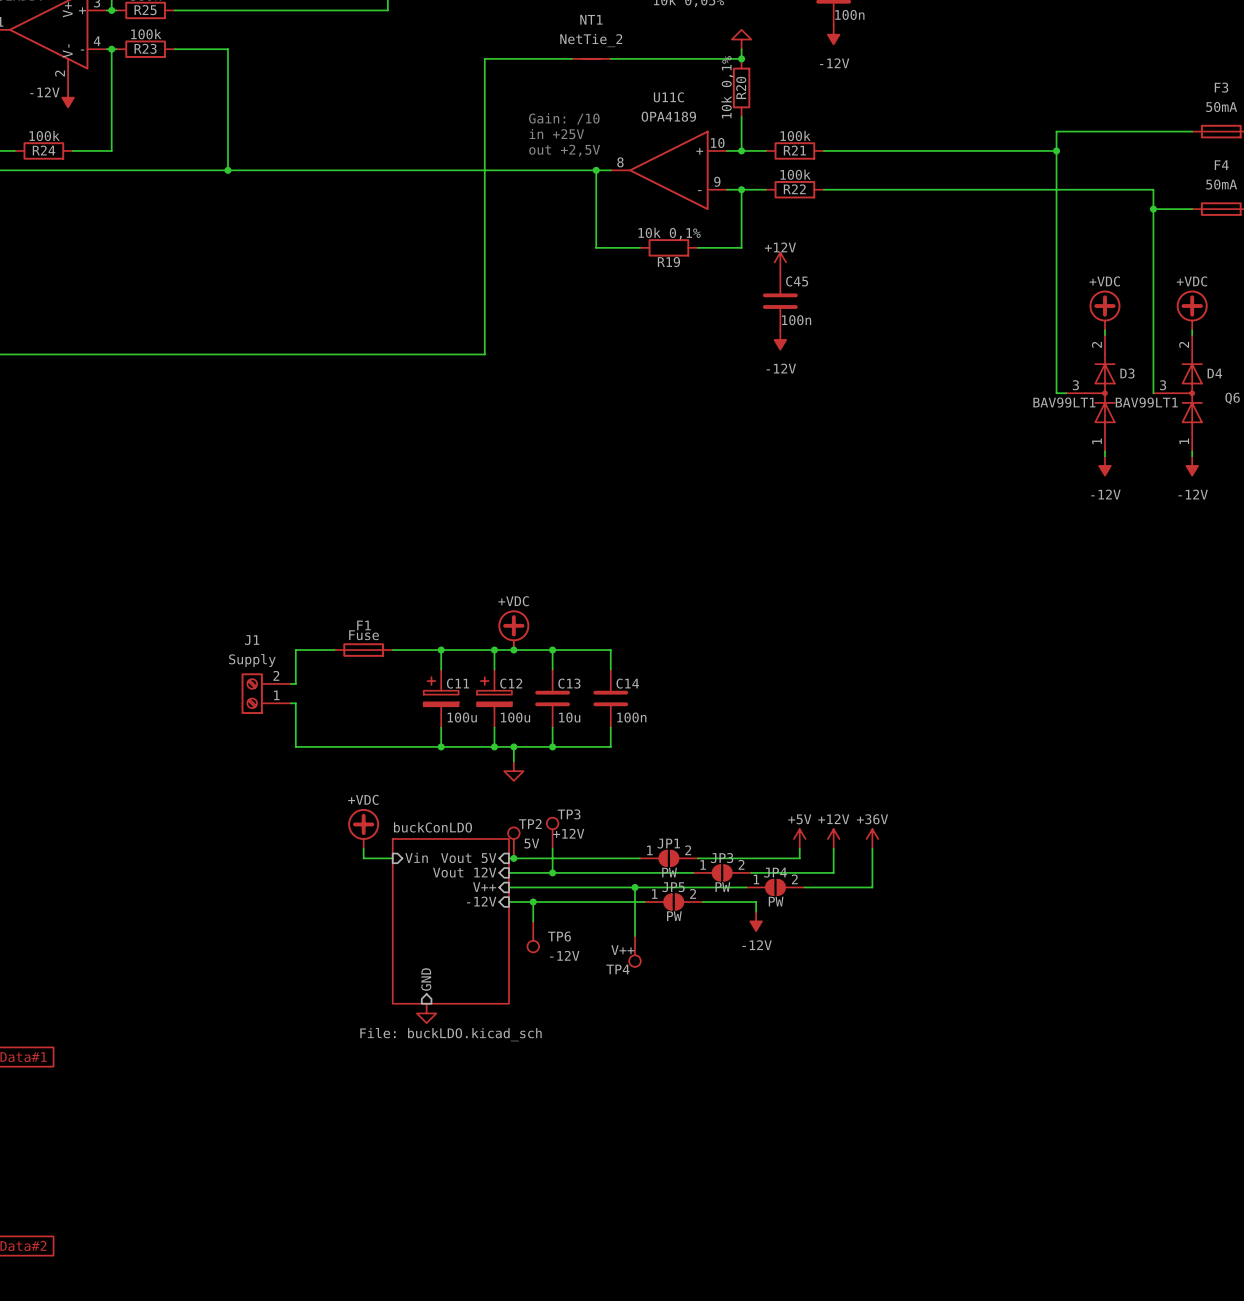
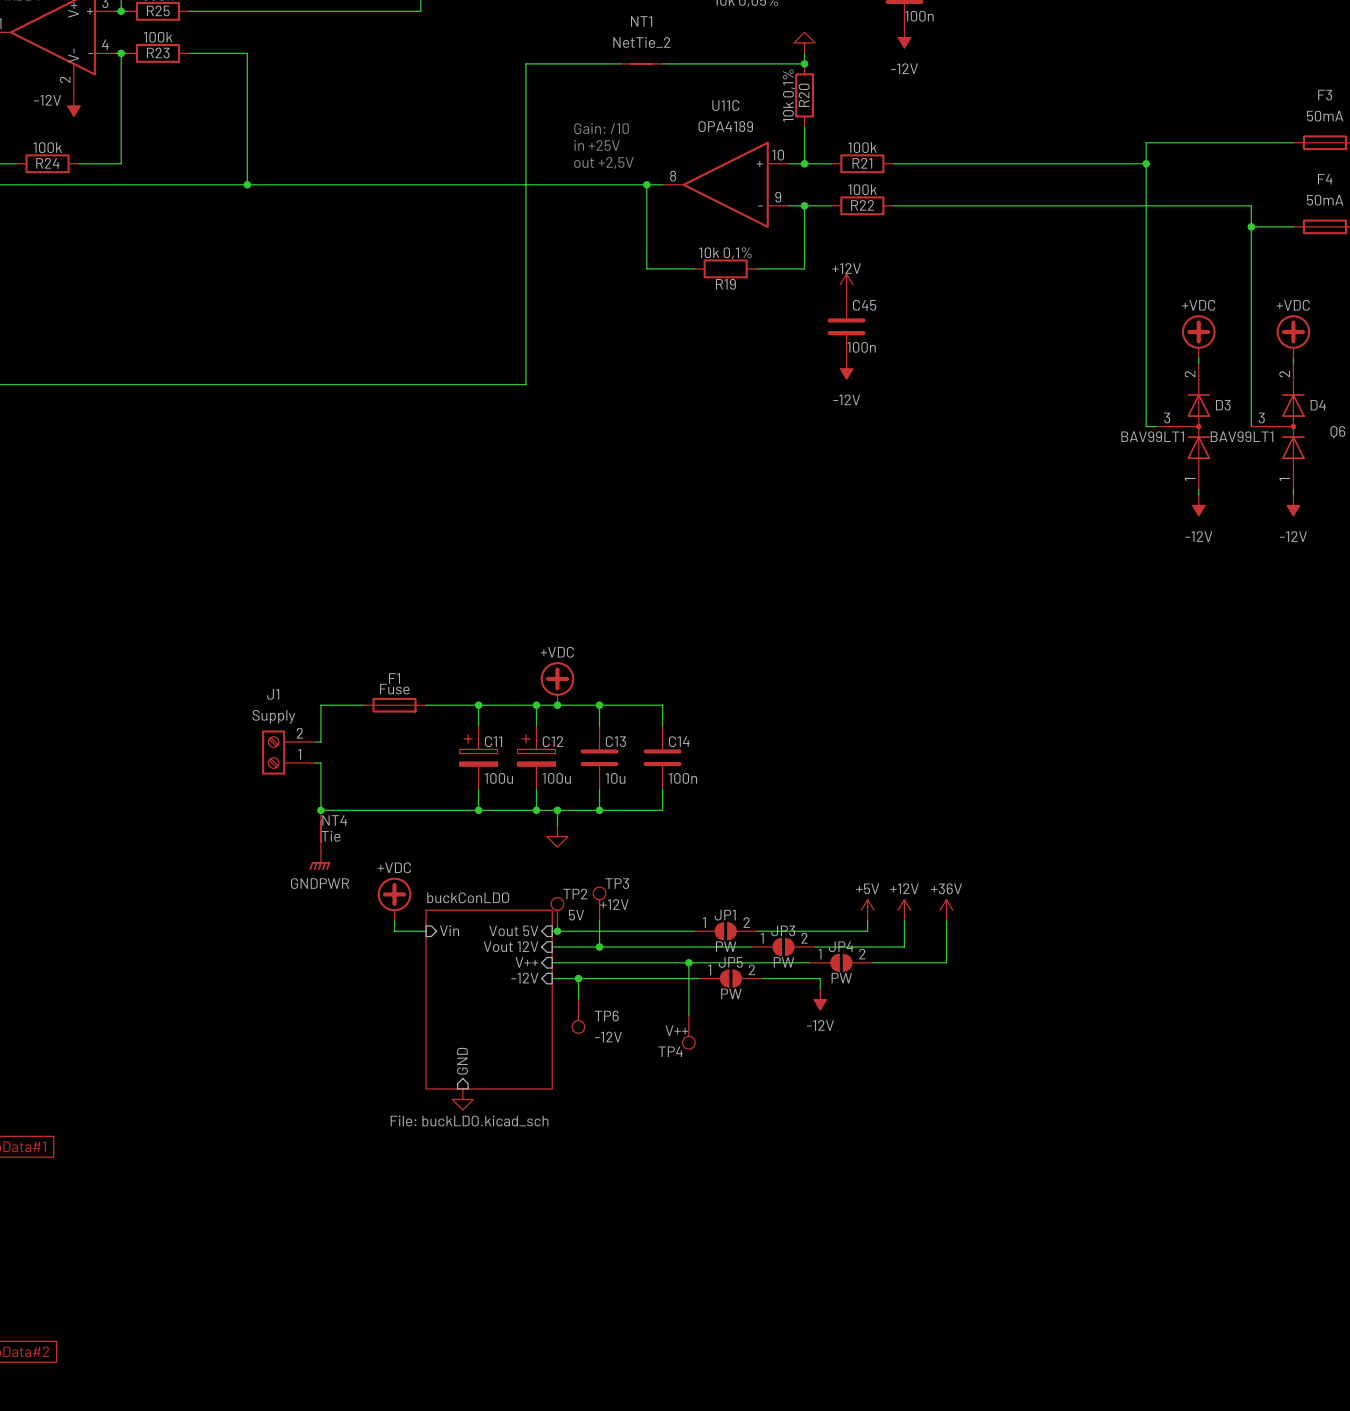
junction: none -> (320, 810)
NT4: none -> Tie (320, 831)
power symbol: none -> GNDPWR (319, 861)

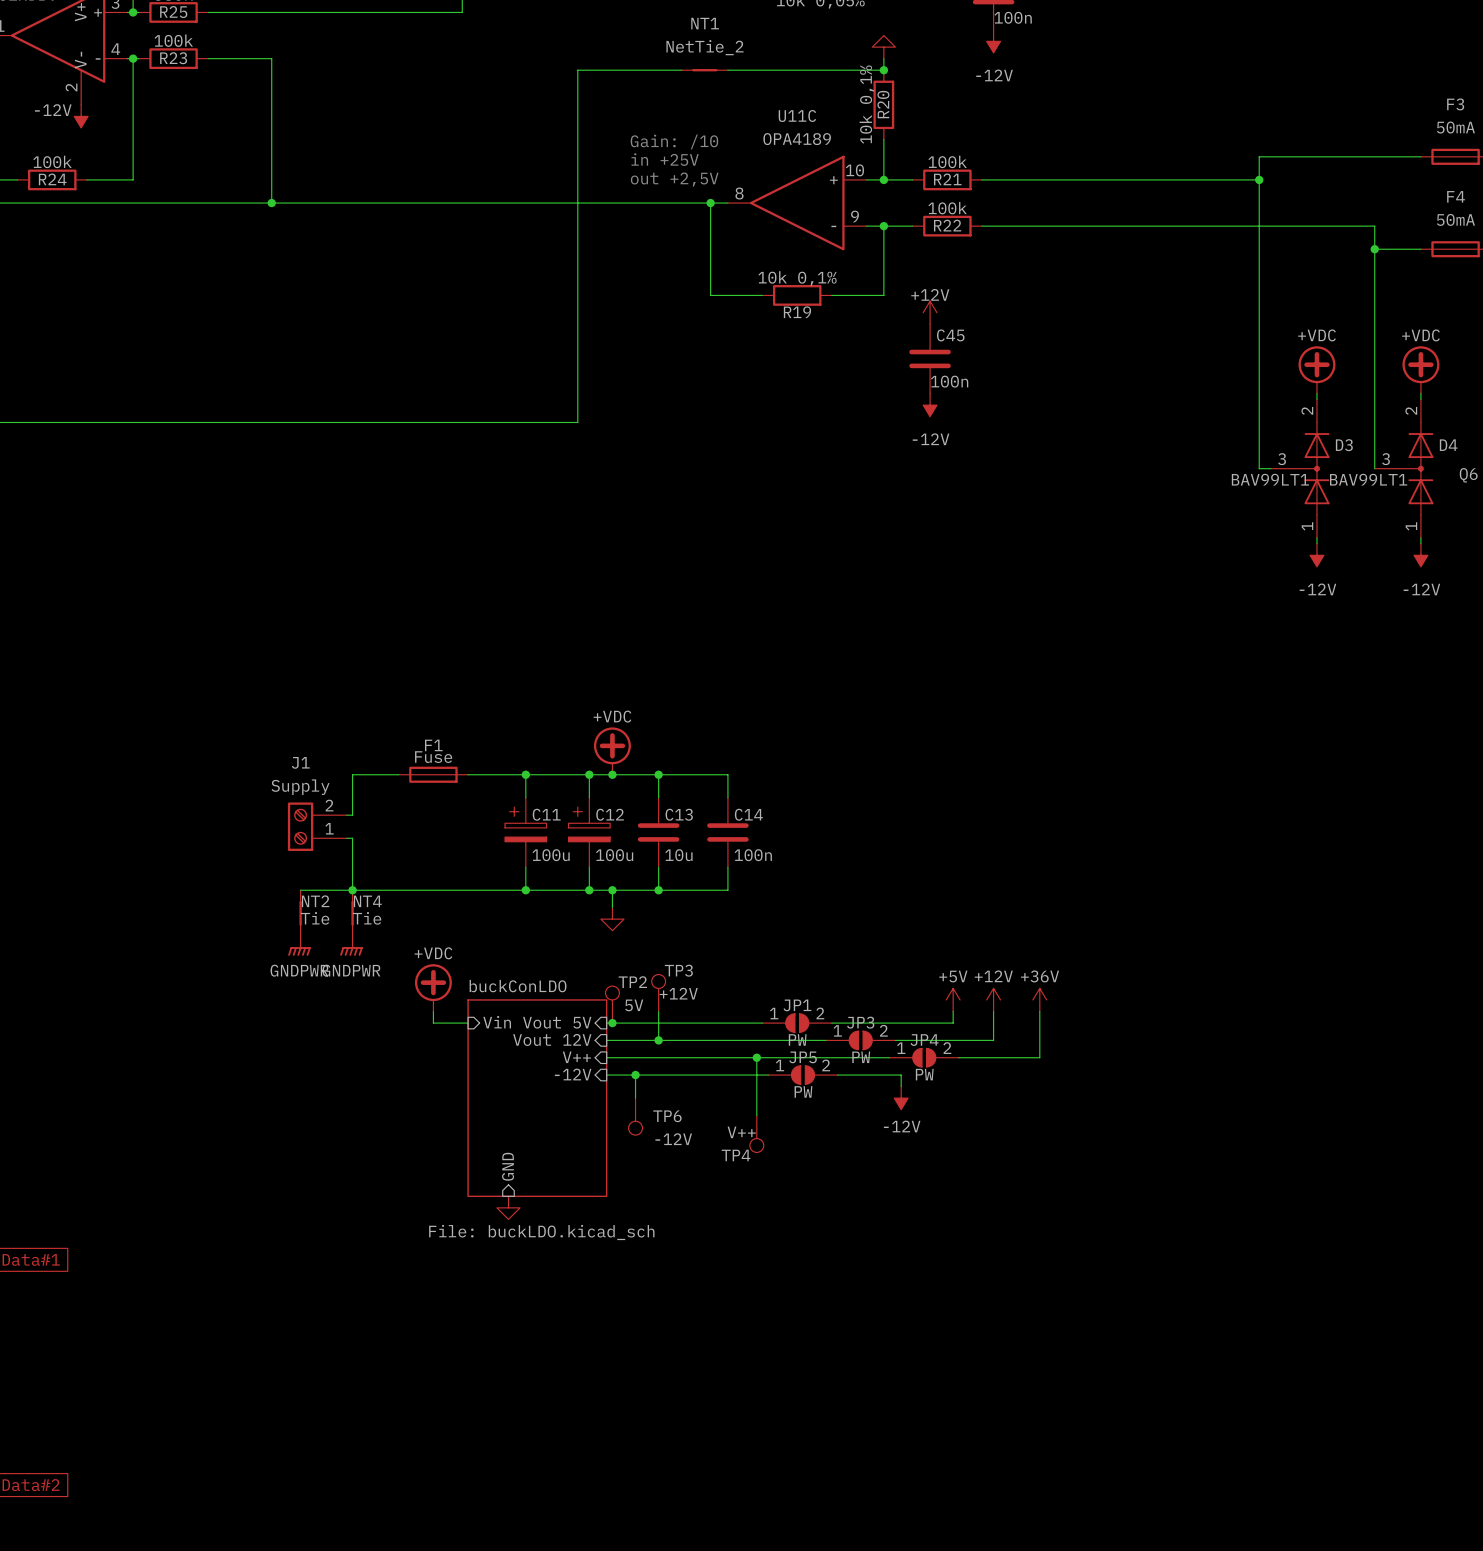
wire: none -> (300, 890) (352, 890)
NT2: none -> Tie (300, 913)
power symbol: none -> GNDPWR (299, 946)

